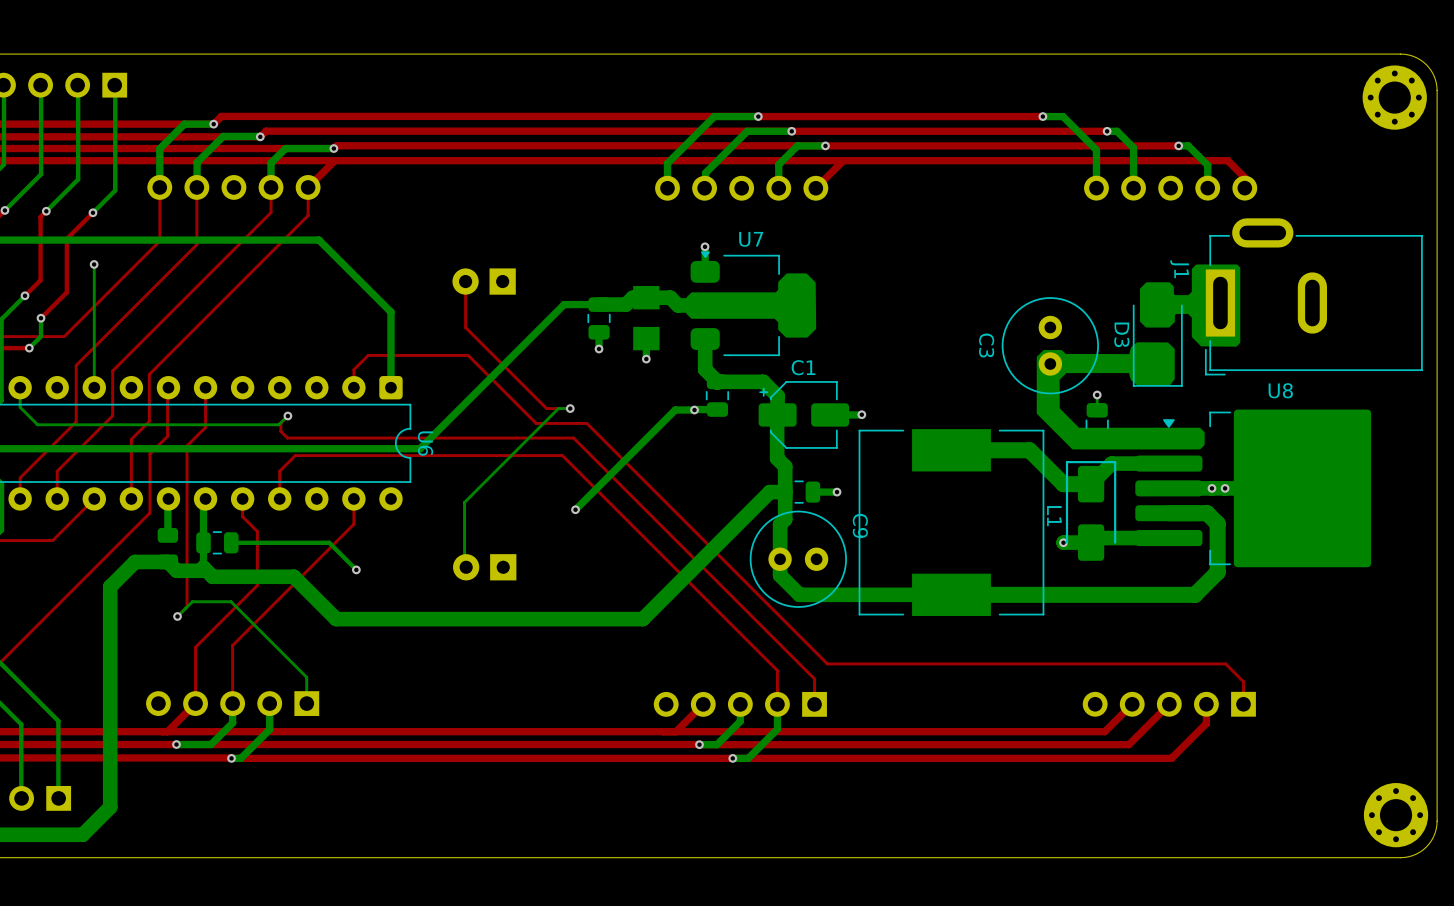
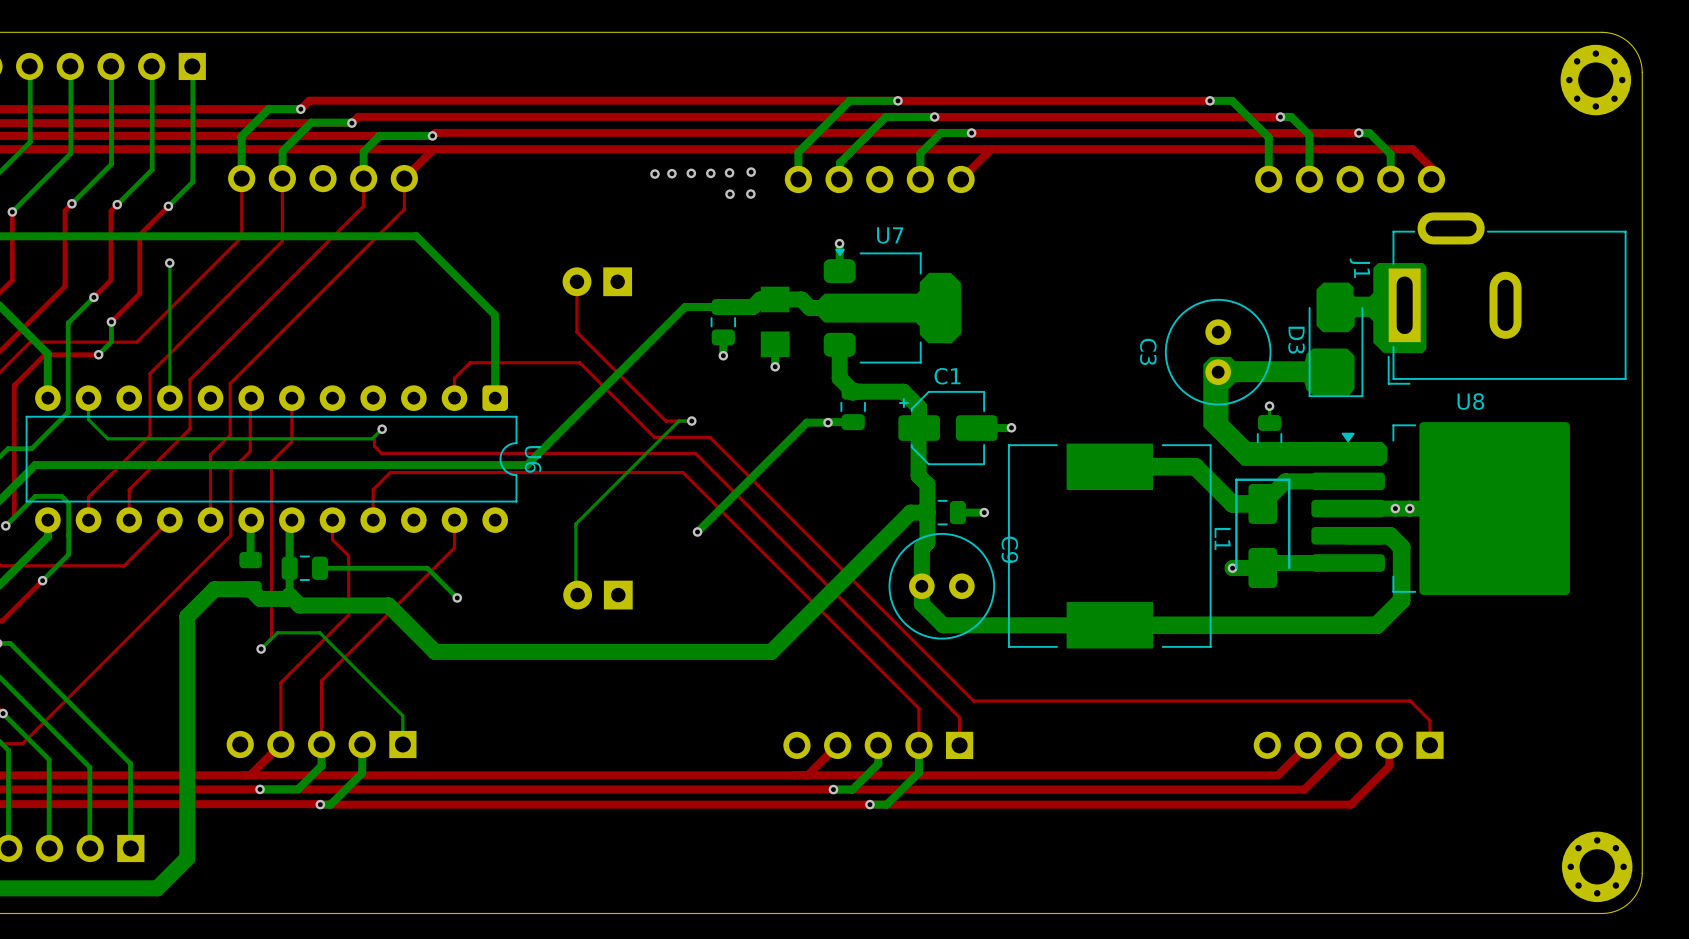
via: none -> (751, 172)
via: none -> (671, 173)
via: none -> (691, 173)
via: none -> (710, 173)
via: none -> (729, 172)
via: none -> (654, 174)
via: none -> (730, 194)
via: none -> (750, 194)

